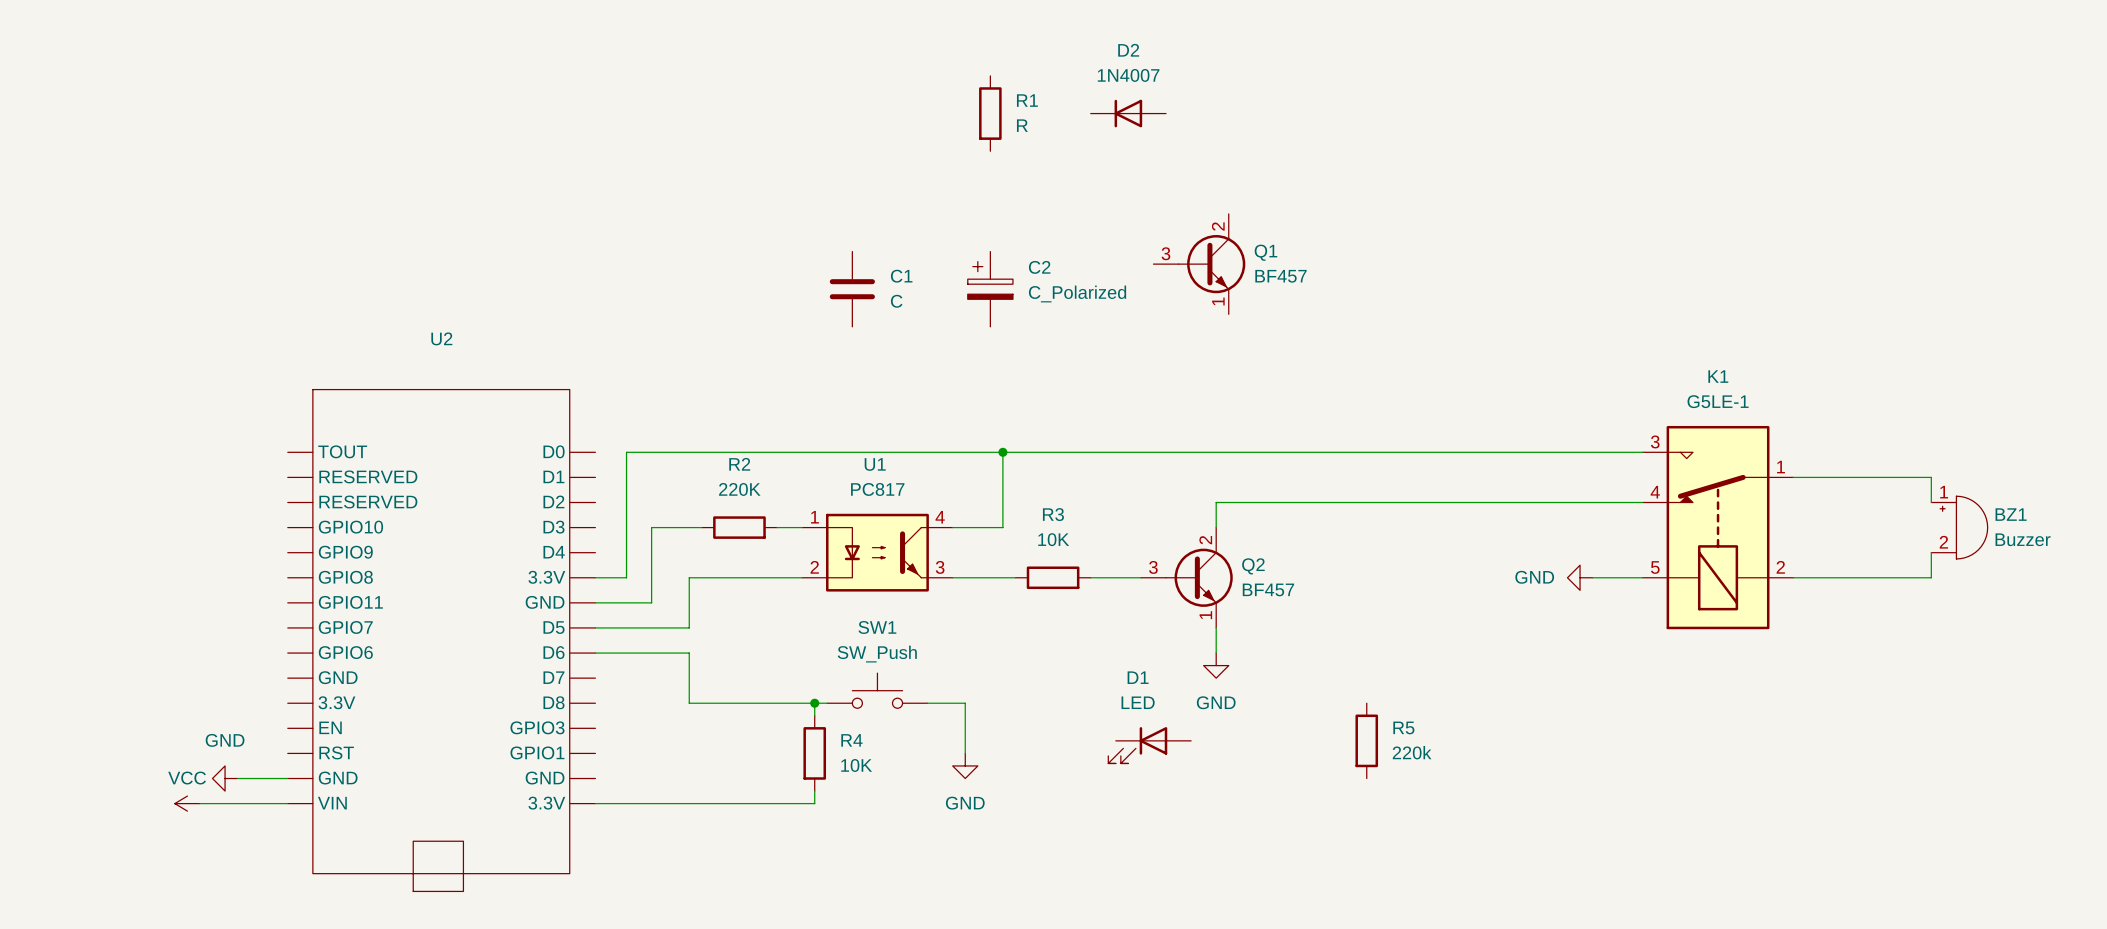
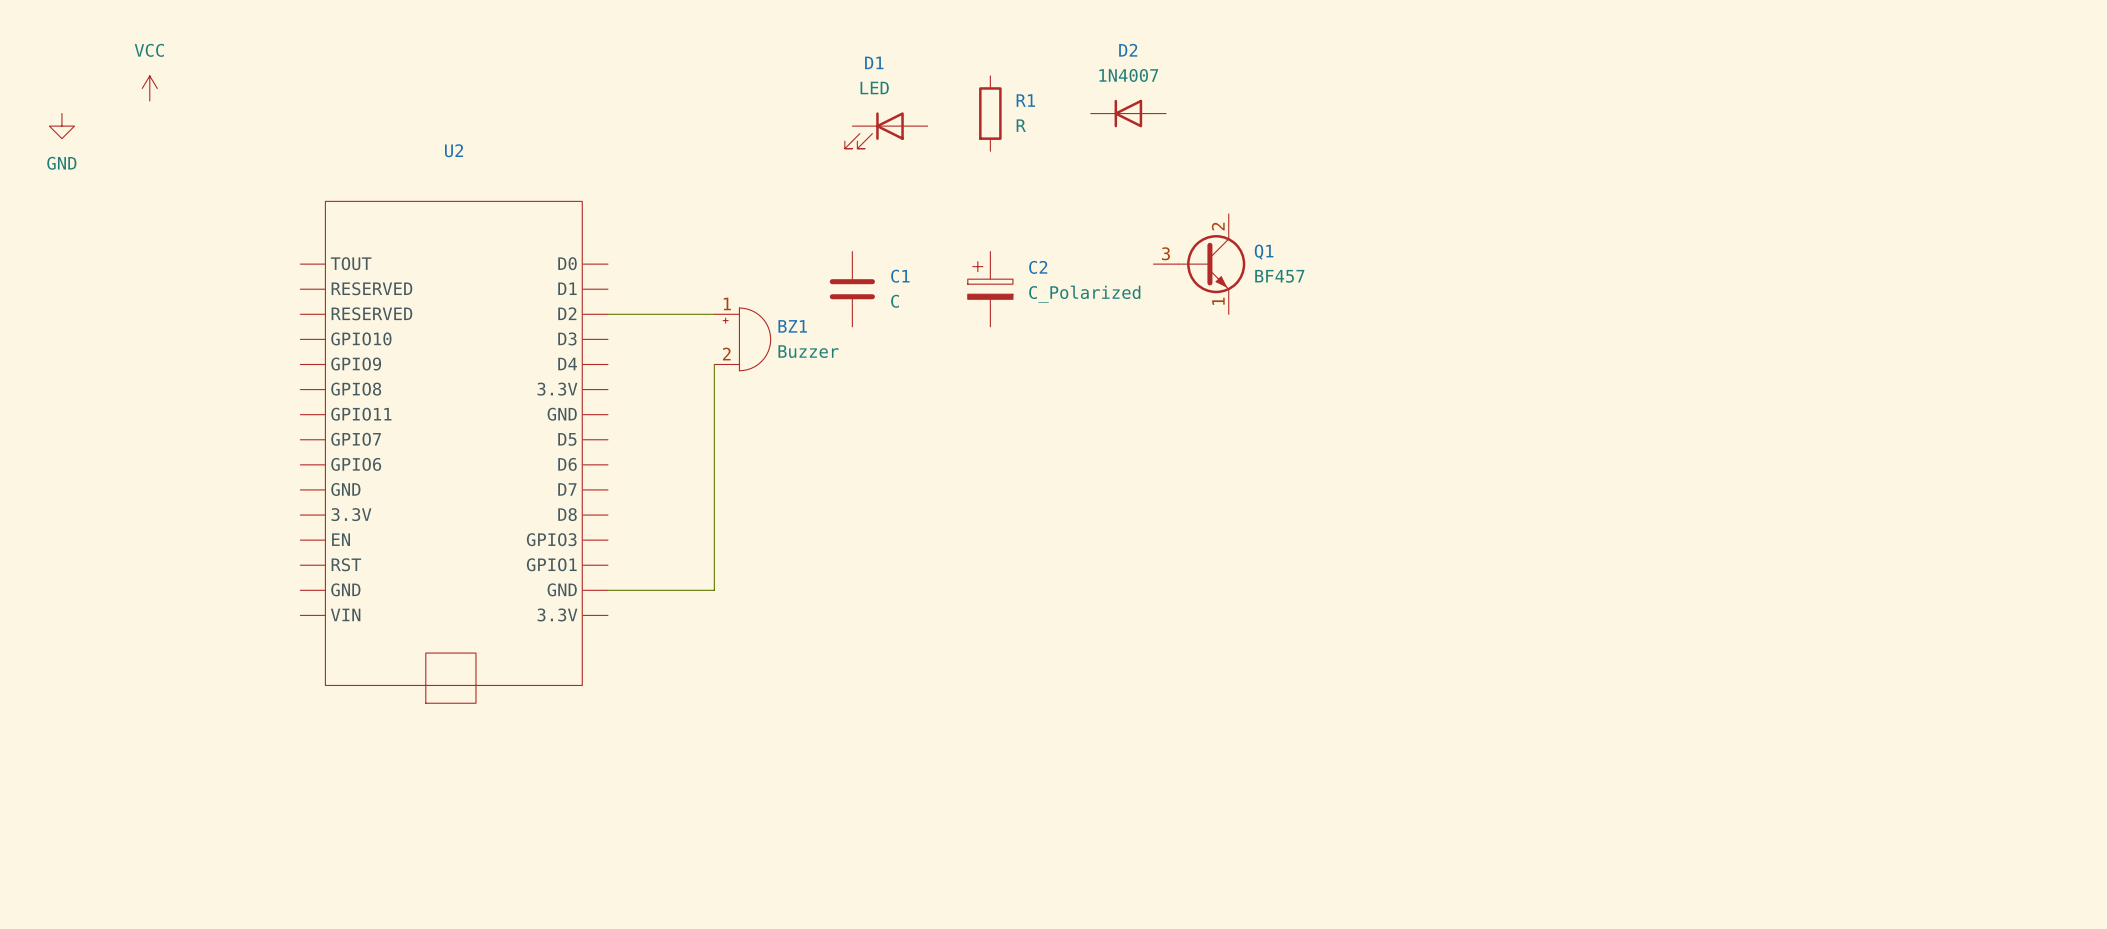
power symbol: none -> VCC (149, 88)
power symbol: none -> GND (61, 126)
wire: none -> (607, 314) (714, 314)
wire: none -> (714, 364) (714, 590) (607, 590)
wire: (1002, 452) (1002, 527) (952, 527) -> none
junction: (1002, 452) -> none
wire: (1642, 452) (626, 452) (626, 577) (595, 577) -> none
wire: (1793, 477) (1931, 477) (1931, 502) -> none
wire: (1642, 502) (1216, 502) (1216, 527) -> none
wire: (701, 527) (651, 527) (651, 602) (595, 602) -> none
R2: 220K (739, 527) -> none
wire: (777, 527) (802, 527) -> none
K1: G5LE-1 (1718, 527) -> none
BZ1 position: (1959, 527) -> (742, 339)
U1: PC817 (877, 552) -> none
wire: (1931, 552) (1931, 577) (1793, 577) -> none
wire: (802, 577) (689, 577) (689, 627) (595, 627) -> none
wire: (952, 577) (1015, 577) -> none
R3: 10K (1053, 577) -> none
wire: (1090, 577) (1140, 577) -> none
Q2: BF457 (1186, 577) -> none
power symbol: GND (1580, 577) -> none
wire: (1592, 577) (1642, 577) -> none
wire: (1216, 627) (1216, 653) -> none
U2 position: (441, 640) -> (454, 452)
wire: (595, 653) (689, 653) (689, 703) (827, 703) -> none
power symbol: GND (1216, 665) -> none
SW1: SW_Push (877, 690) -> none
wire: (814, 703) (814, 715) -> none
junction: (814, 703) -> none
wire: (927, 703) (965, 703) (965, 753) -> none
R5: 220k (1366, 740) -> none
D1 position: (1149, 745) -> (886, 130)
R4: 10K (814, 753) -> none
power symbol: GND (965, 765) -> none
power symbol: GND (225, 778) -> none
wire: (237, 778) (287, 778) -> none
wire: (814, 791) (814, 803) (595, 803) -> none
power symbol: VCC (187, 803) -> none
wire: (199, 803) (287, 803) -> none

